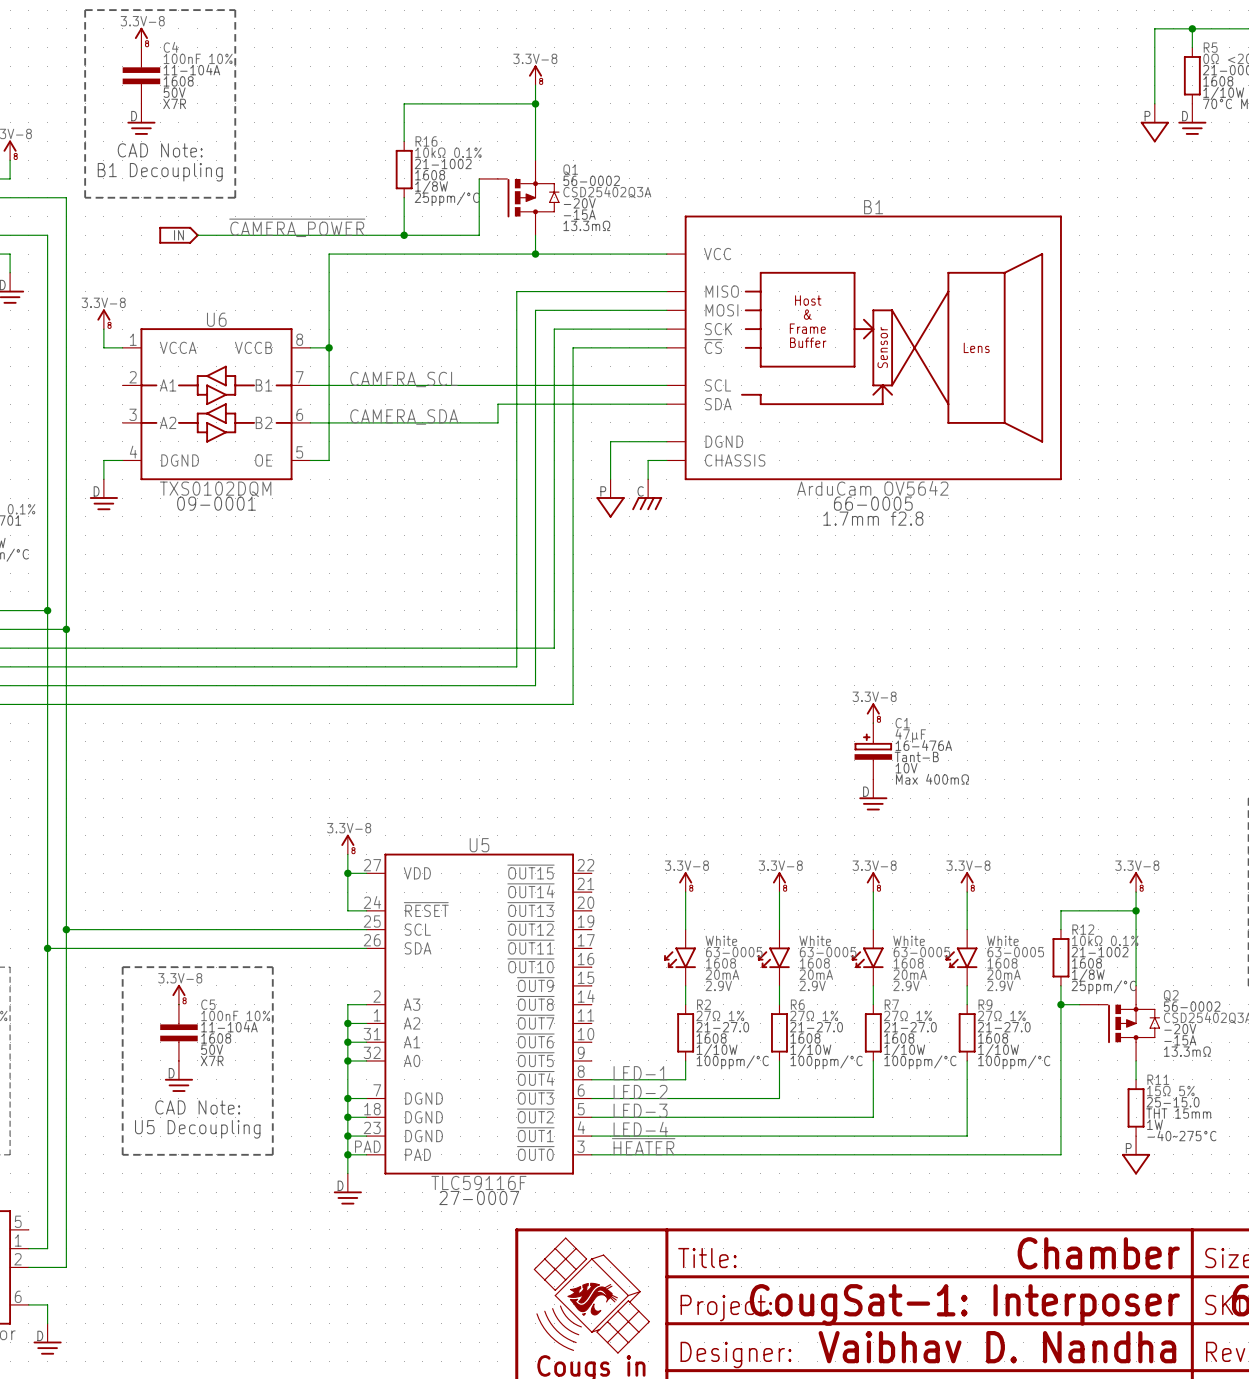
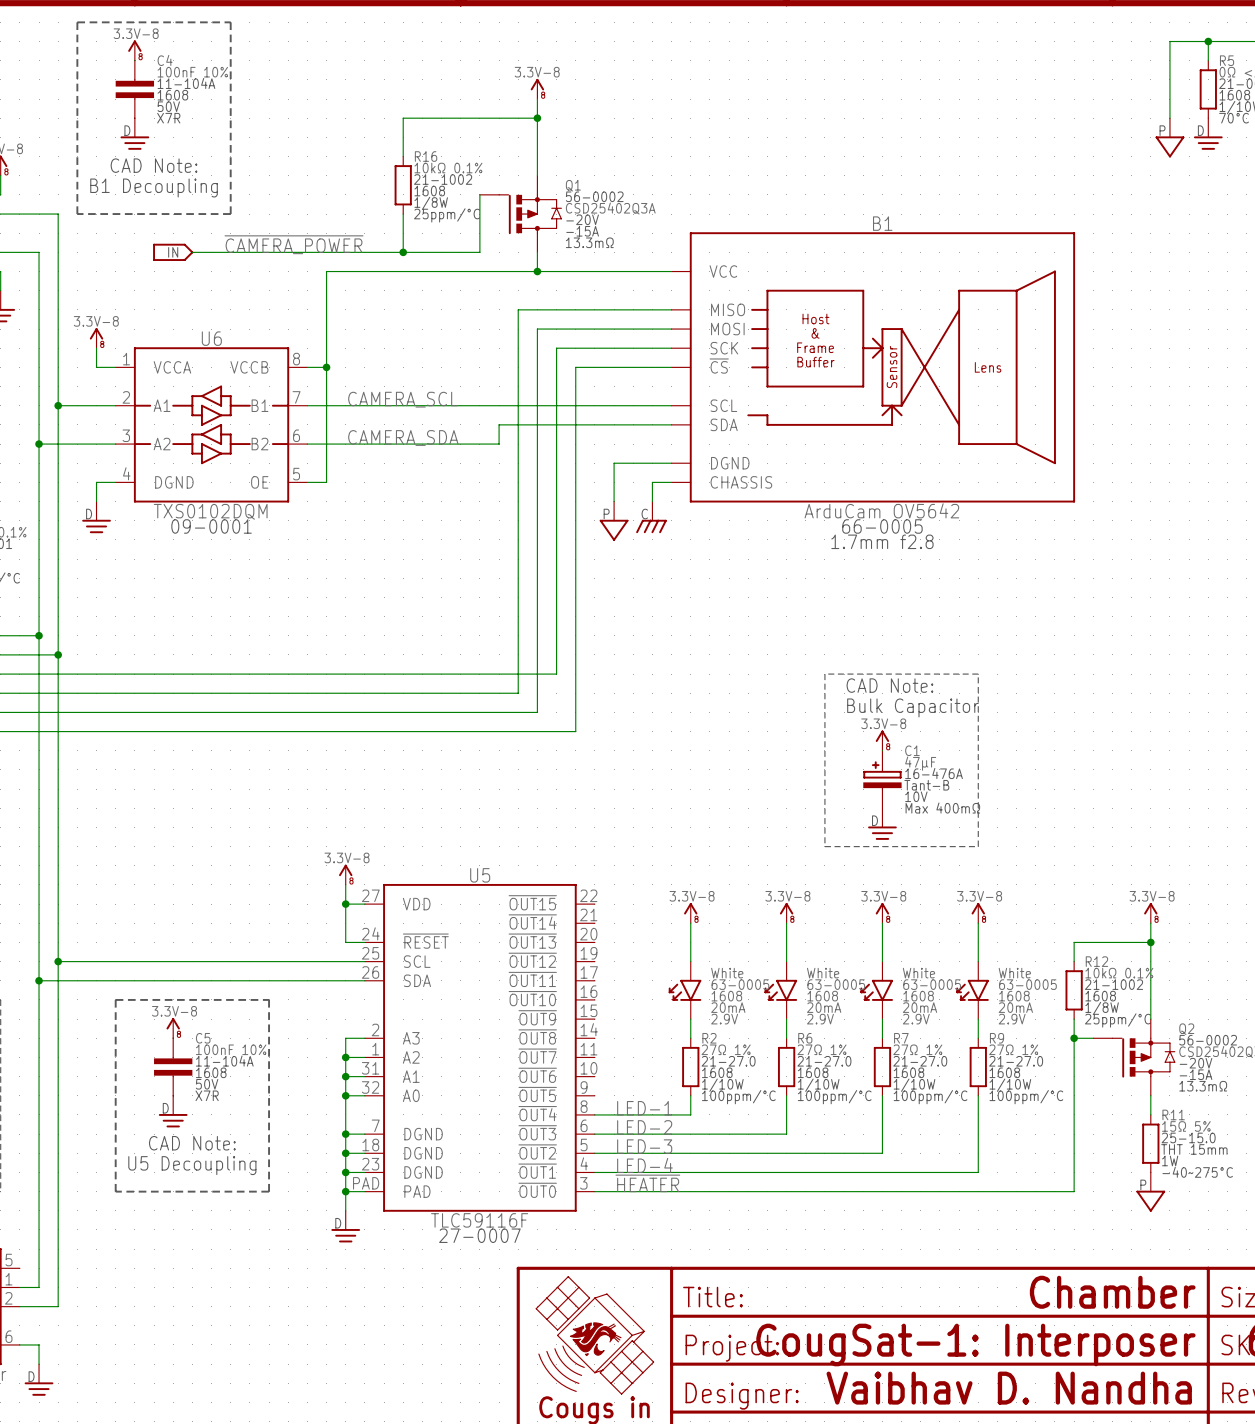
wire: none -> (58, 405) (115, 405)
junction: none -> (58, 405)
wire: none -> (39, 444) (115, 444)
junction: none -> (39, 444)
line: none -> (824, 674) (824, 846) (978, 846) (978, 674) (824, 674)
text: none -> CAD Note: (889, 685)
text: none -> Bulk Capacitor (912, 707)

